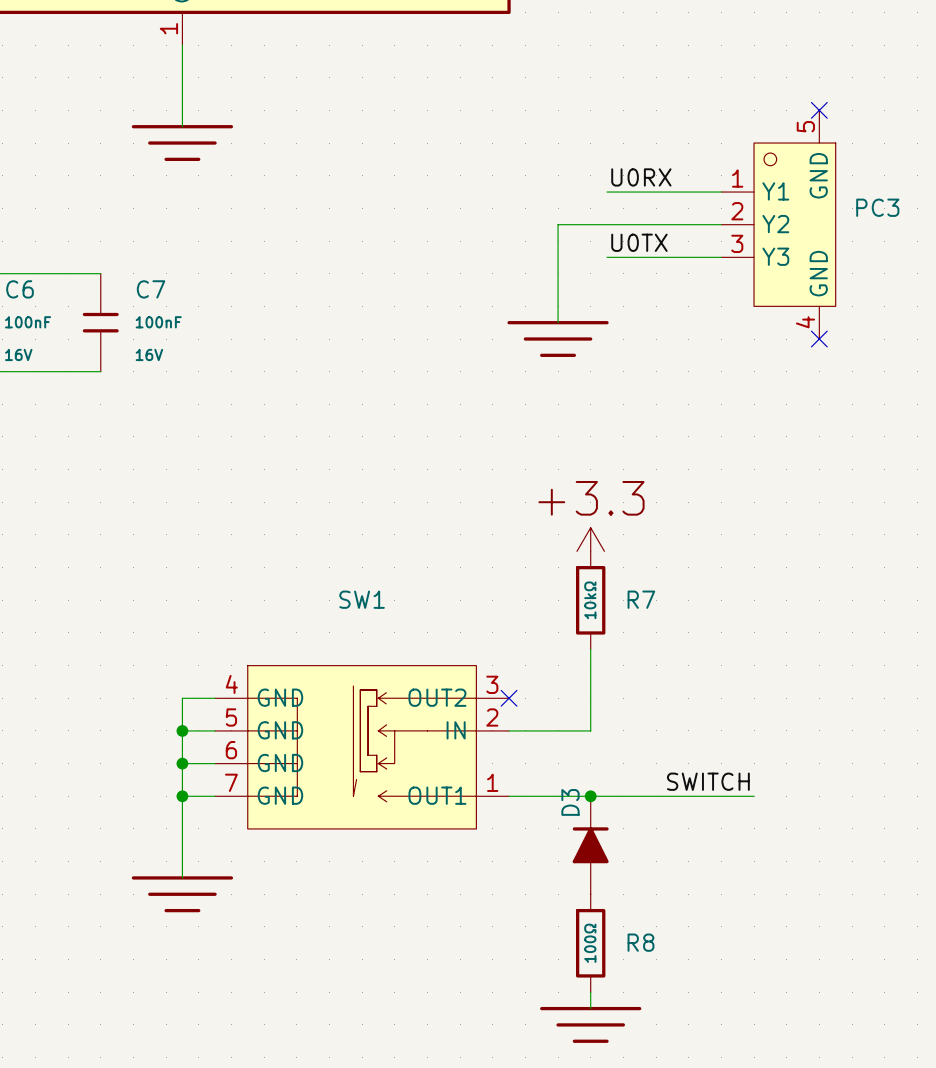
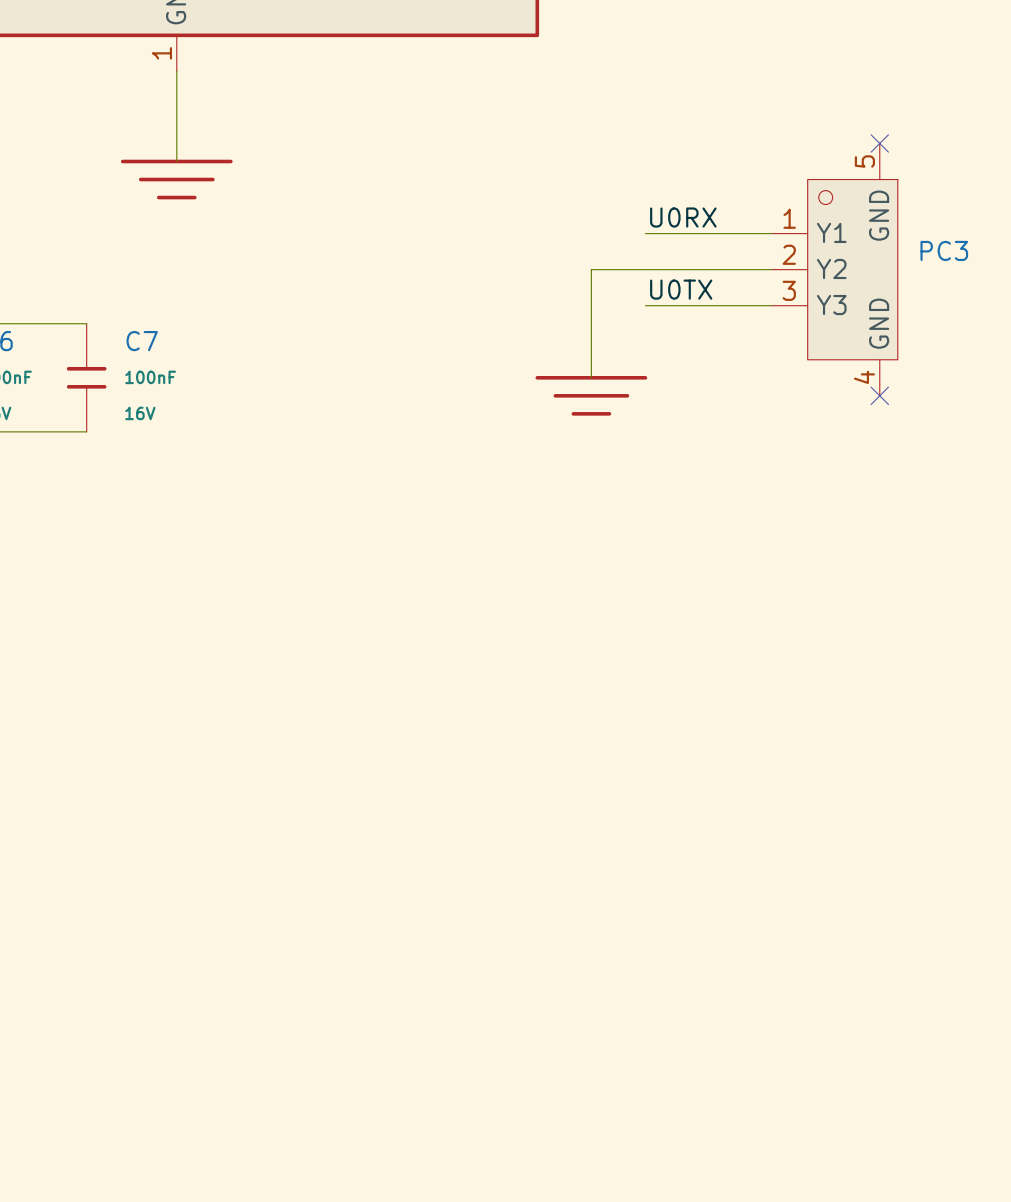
power symbol: (590, 539) -> none
R7: 10kΩ (590, 600) -> none
wire: (590, 649) (590, 730) (509, 730) -> none
wire: (215, 698) (182, 698) (182, 877) -> none
no-connect mark: (509, 698) -> none
wire: (182, 730) (215, 730) -> none
junction: (182, 730) -> none
SW1: (362, 747) -> none
wire: (182, 763) (215, 763) -> none
junction: (182, 763) -> none
label: SWITCH (708, 781) -> none
wire: (182, 796) (215, 796) -> none
junction: (182, 796) -> none
wire: (509, 796) (754, 796) -> none
junction: (590, 796) -> none
D3: (590, 845) -> none
power symbol: (182, 894) -> none
R8: 100Ω (590, 943) -> none
wire: (590, 992) (590, 1008) -> none
power symbol: (590, 1024) -> none

